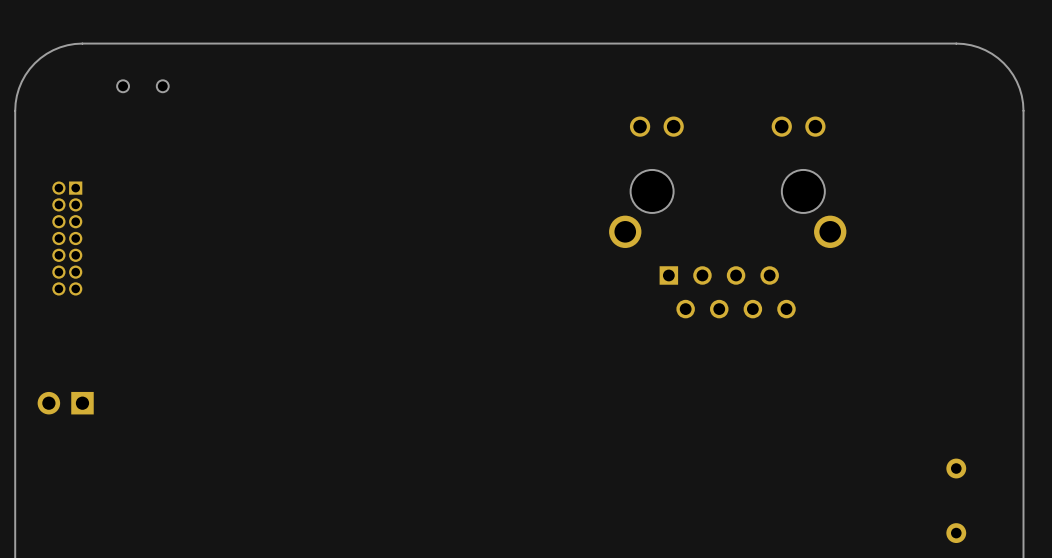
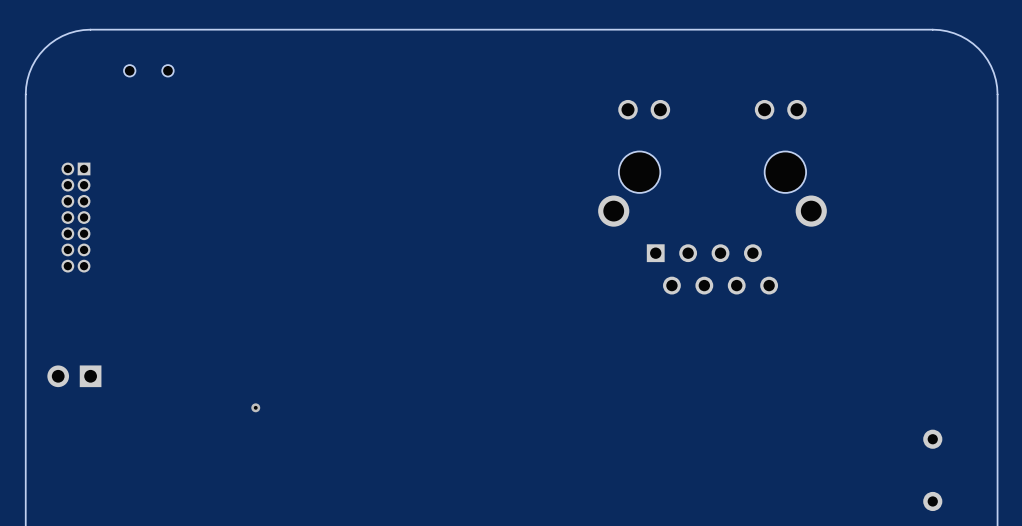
via: none -> (255, 407)

